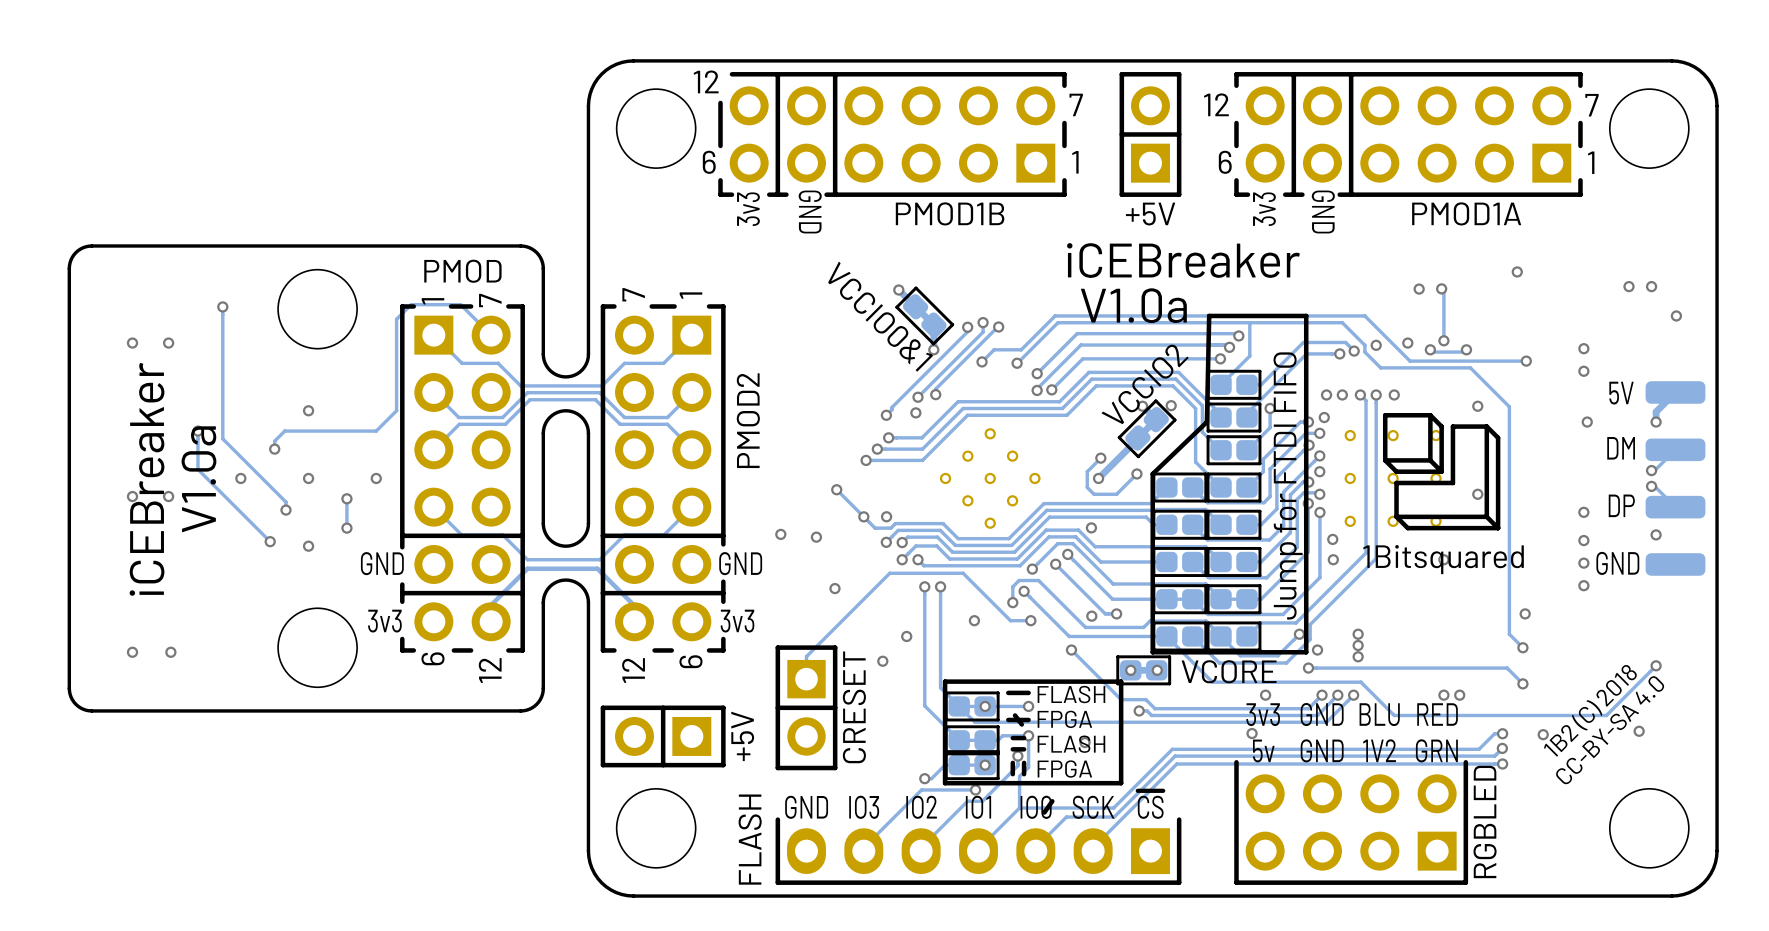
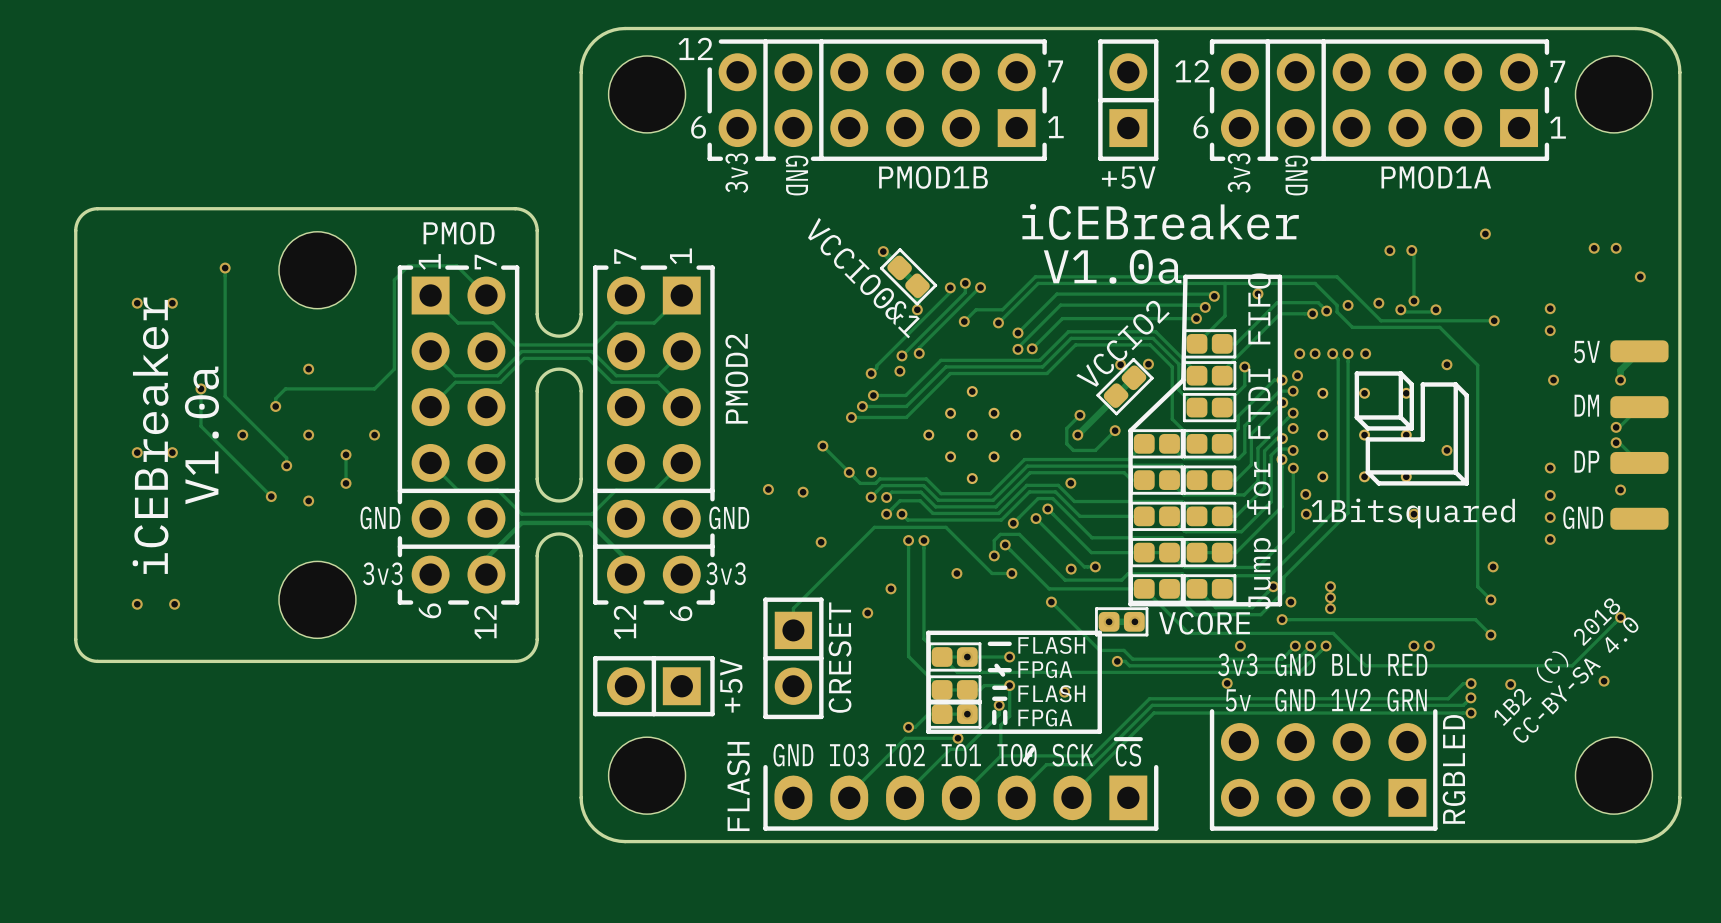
via: none -> (1257, 293)

